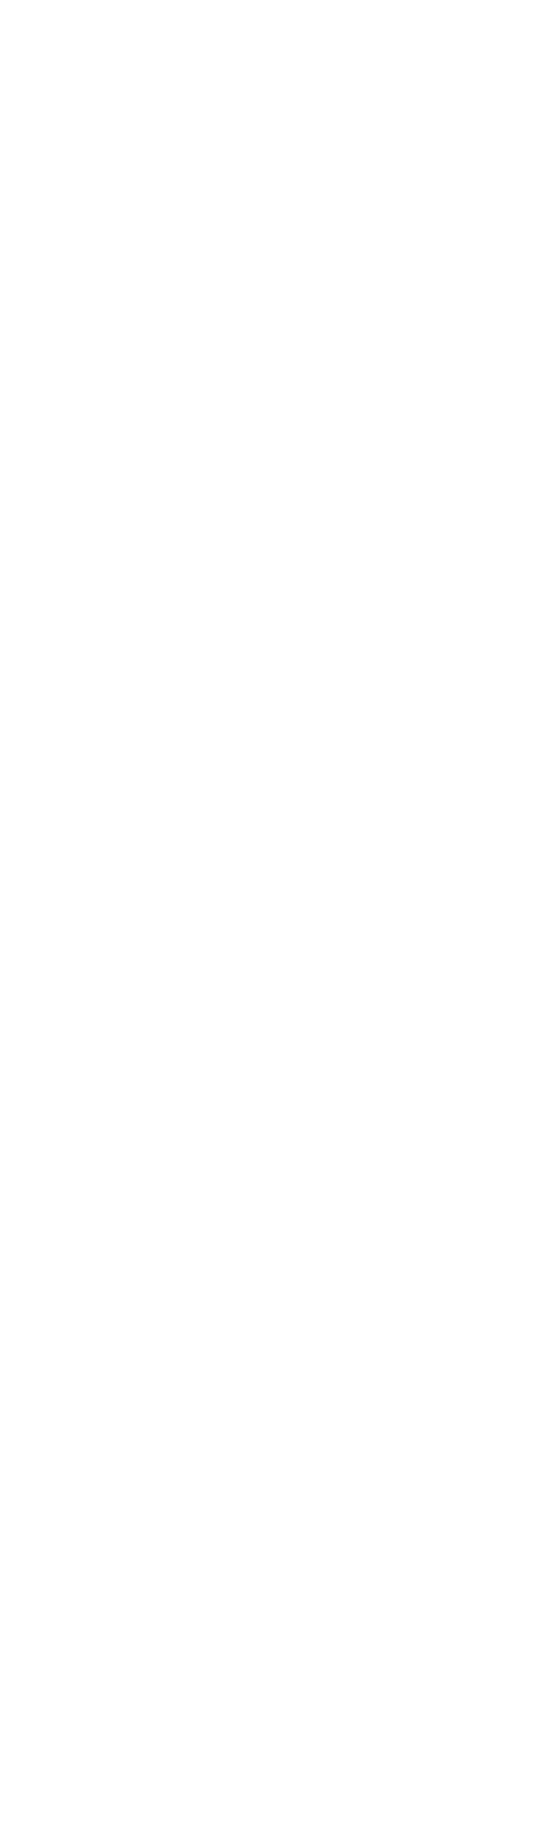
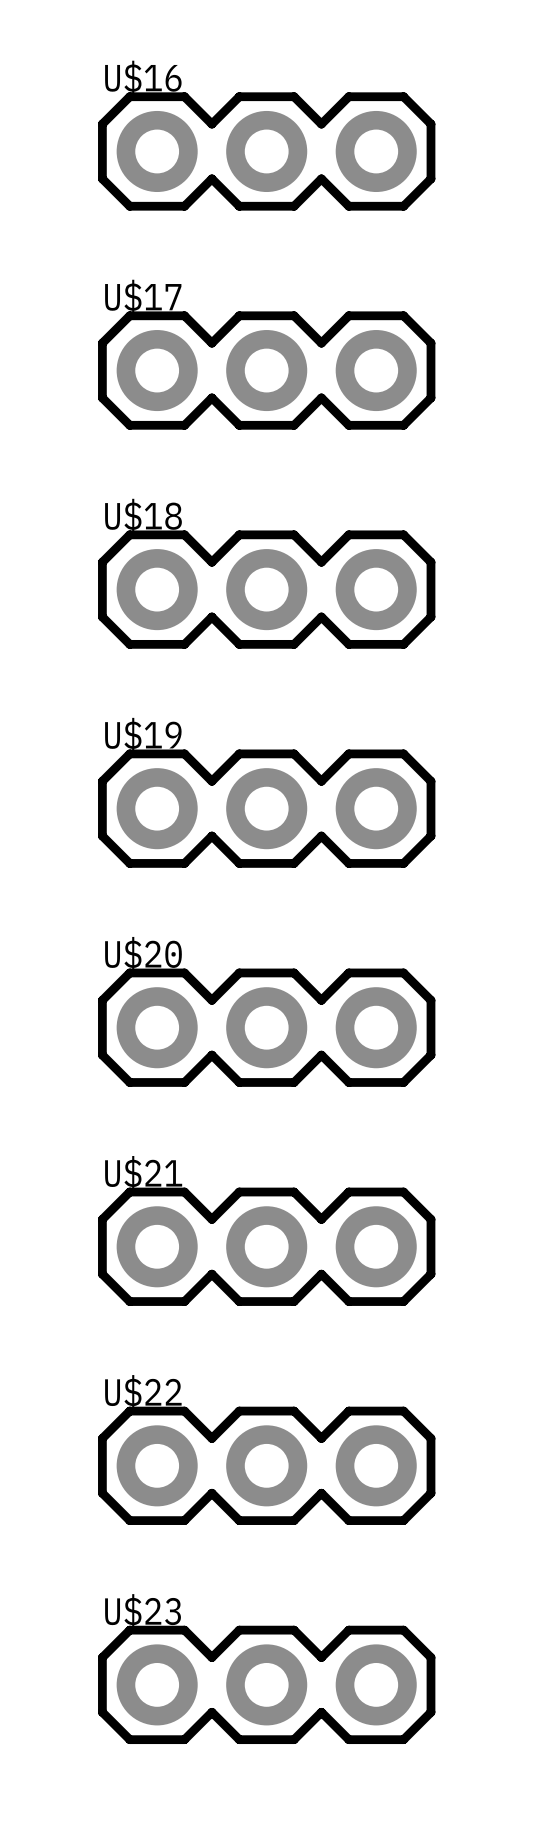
U$16: none -> (266, 151)
U$17: none -> (266, 370)
U$18: none -> (266, 589)
U$19: none -> (266, 808)
U$20: none -> (266, 1027)
U$21: none -> (266, 1246)
U$22: none -> (266, 1465)
U$23: none -> (266, 1684)

